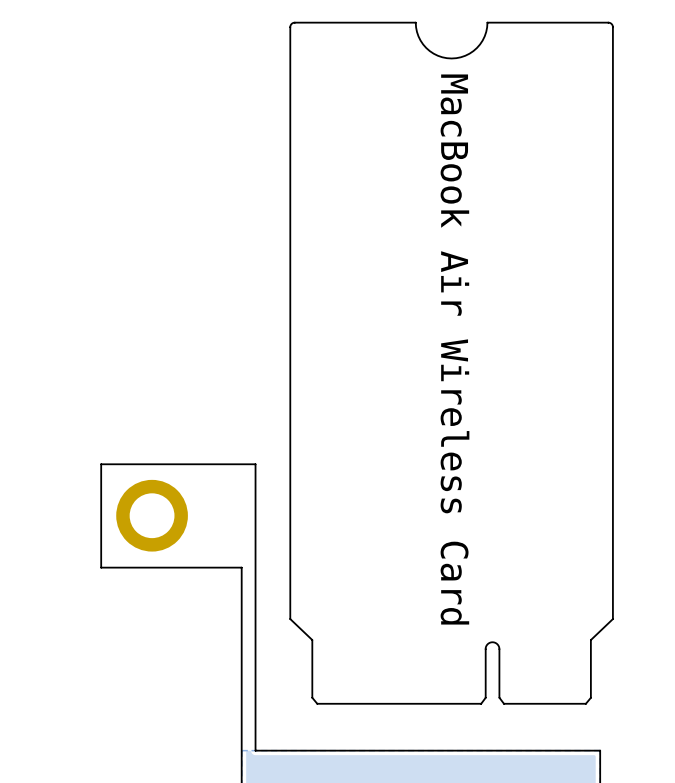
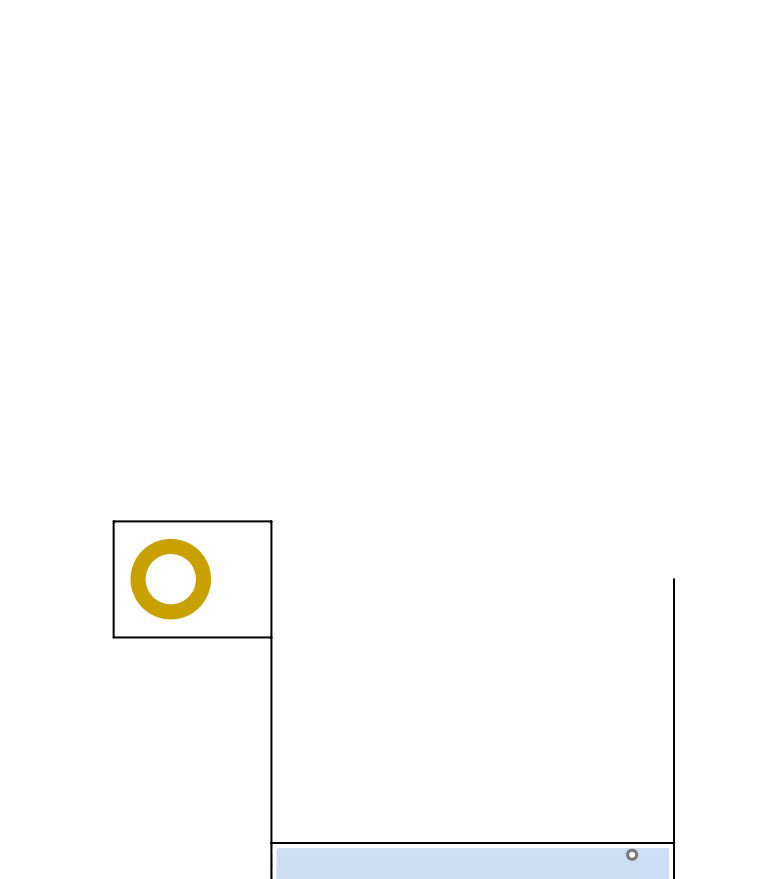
part: (451, 363) -> none
board edge: (241, 464) (255, 464) (255, 750) -> (271, 521) (271, 637)
board edge: none -> (674, 579) (674, 842)
board edge: none -> (286, 842) (271, 842)
via: none -> (632, 854)

